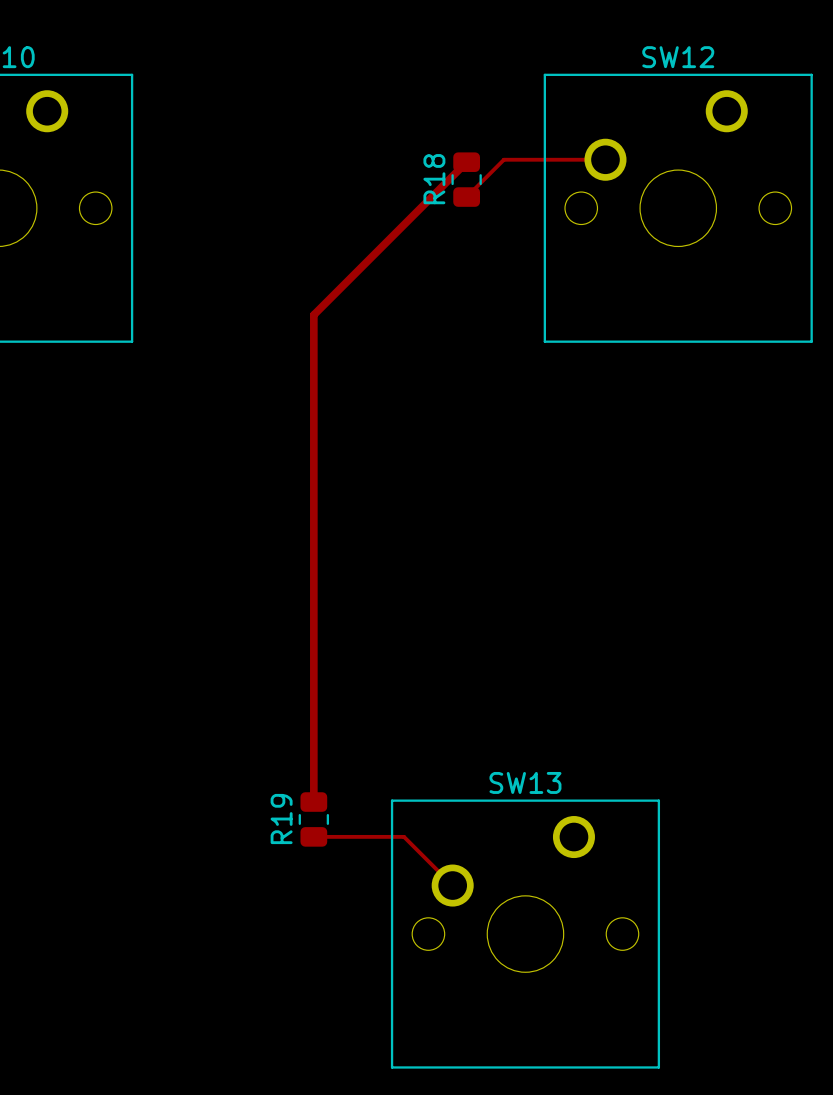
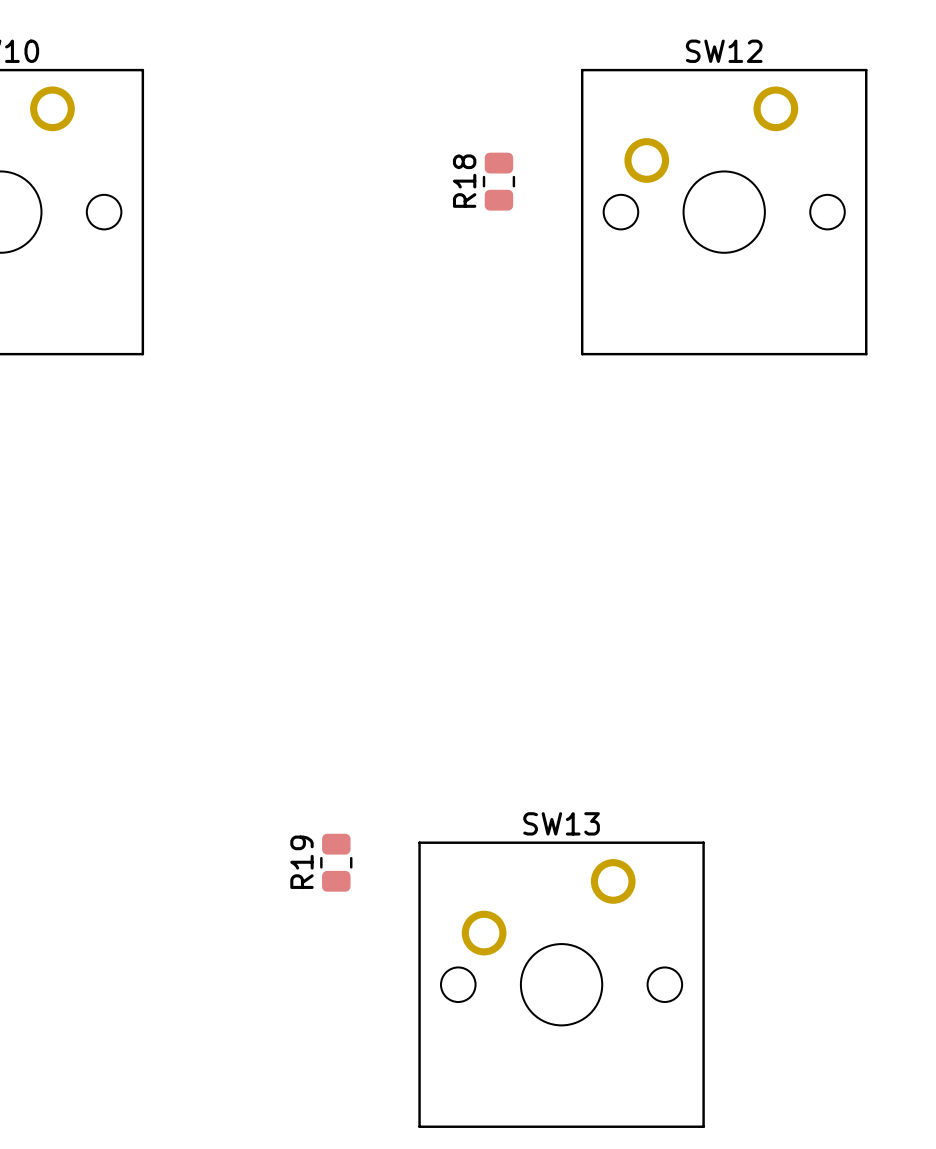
top track: (605, 159) (503, 159) (466, 197) -> none
top track: (466, 162) (313, 314) (313, 802) -> none
top track: (313, 836) (404, 836) (452, 885) -> none

